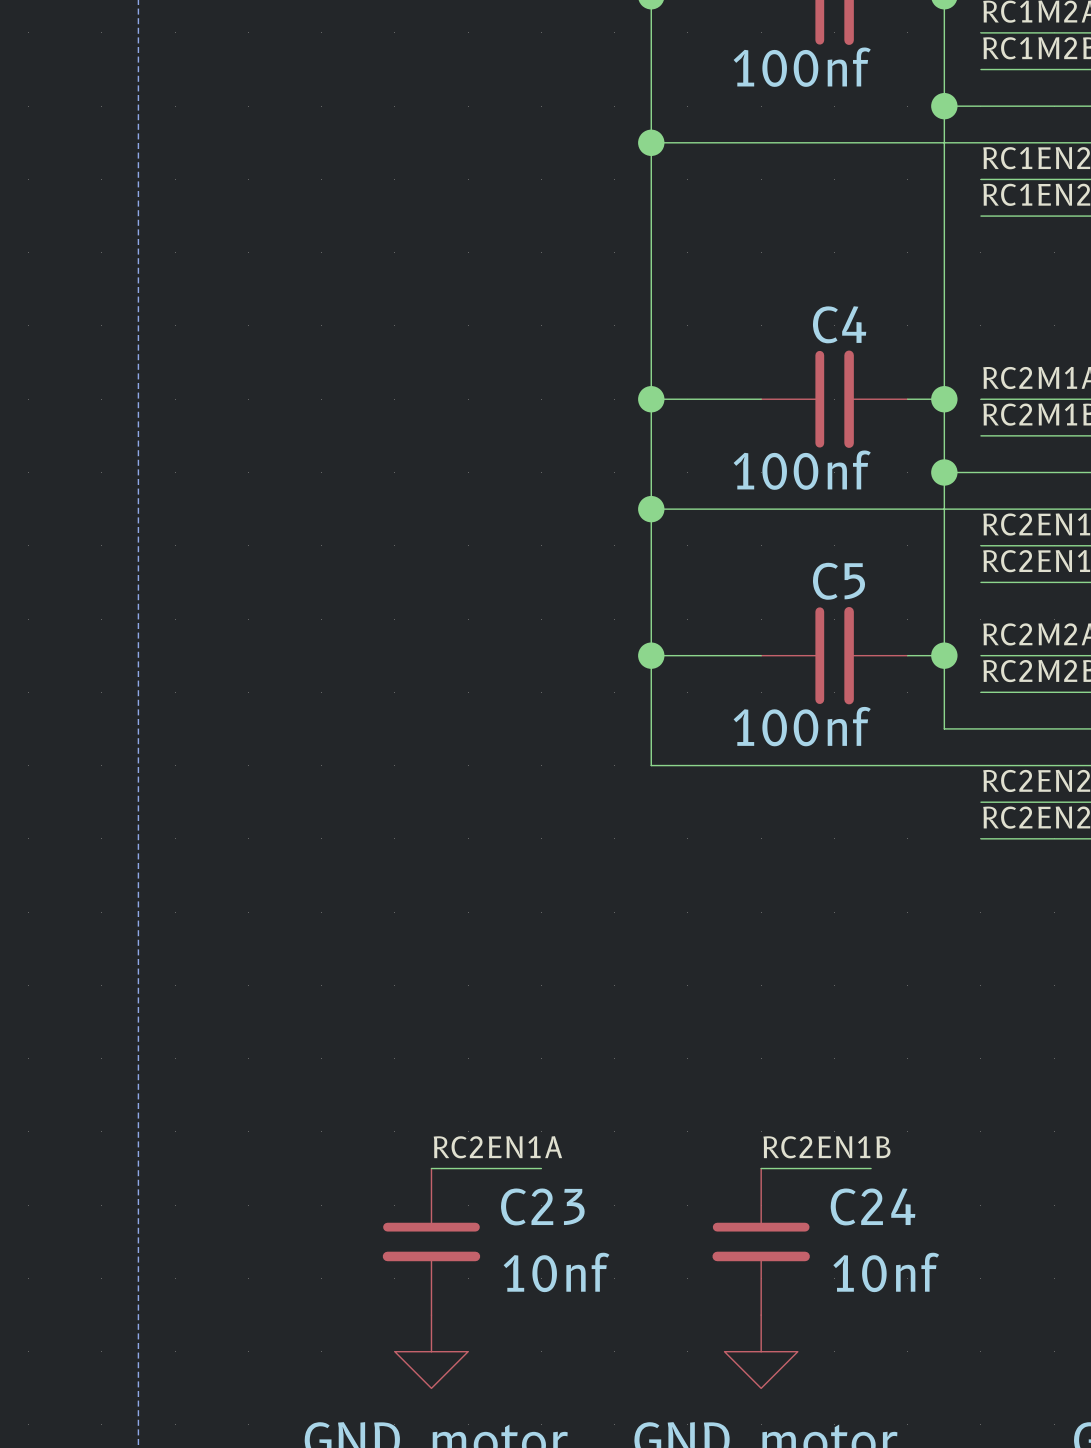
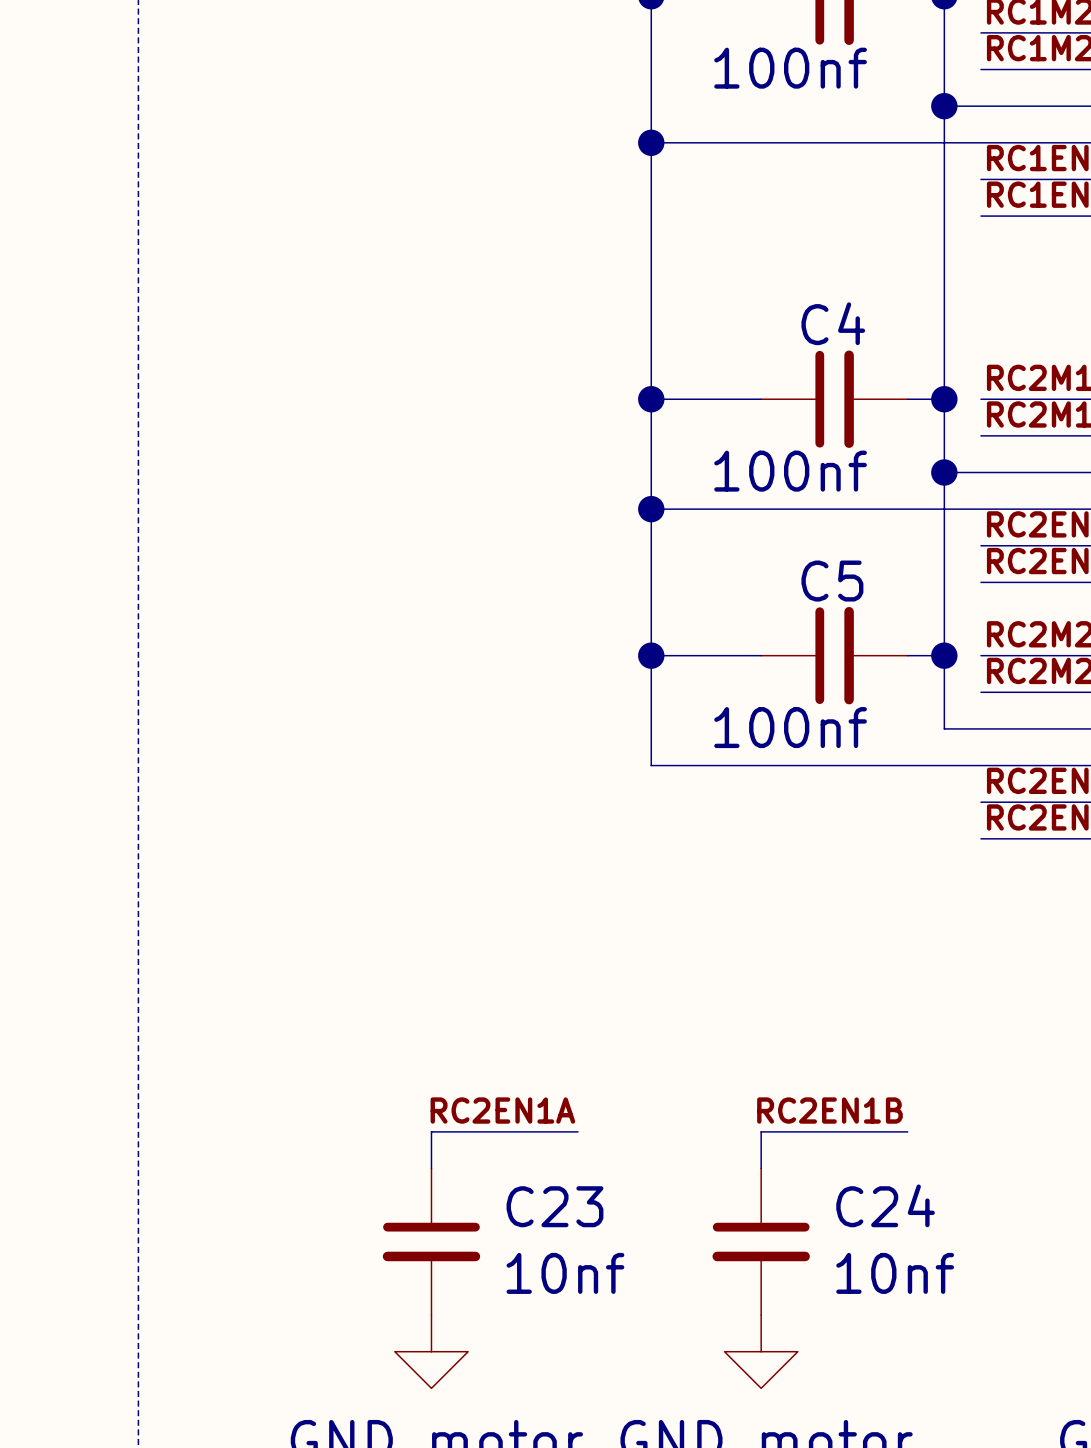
label position: RC2EN1A (497, 1147) -> RC2EN1A (502, 1110)
label position: RC2EN1B (826, 1147) -> RC2EN1B (829, 1110)
wire: (431, 1168) (541, 1168) -> (431, 1168) (431, 1131) (578, 1131)
wire: (761, 1168) (871, 1168) -> (761, 1168) (761, 1131) (907, 1131)

